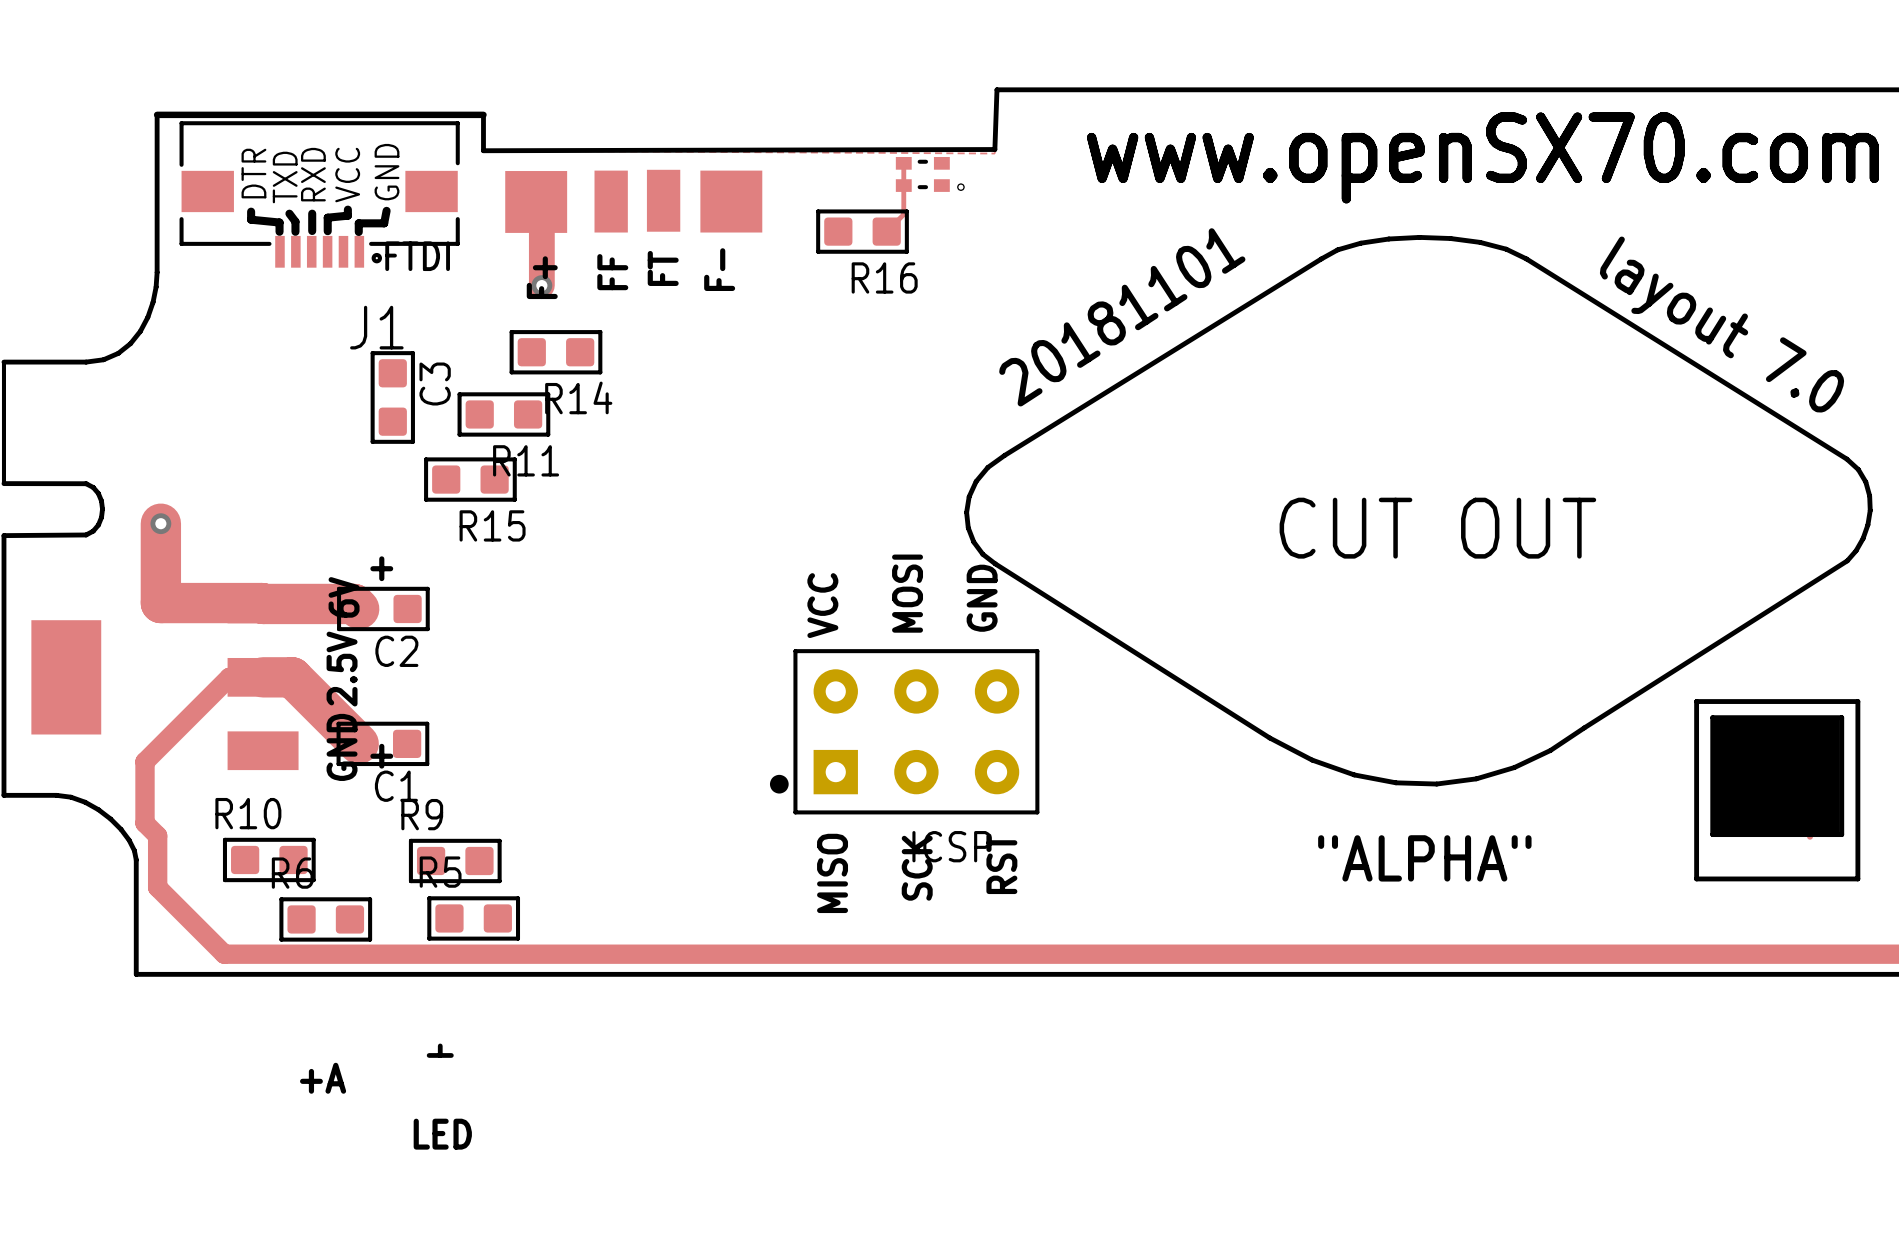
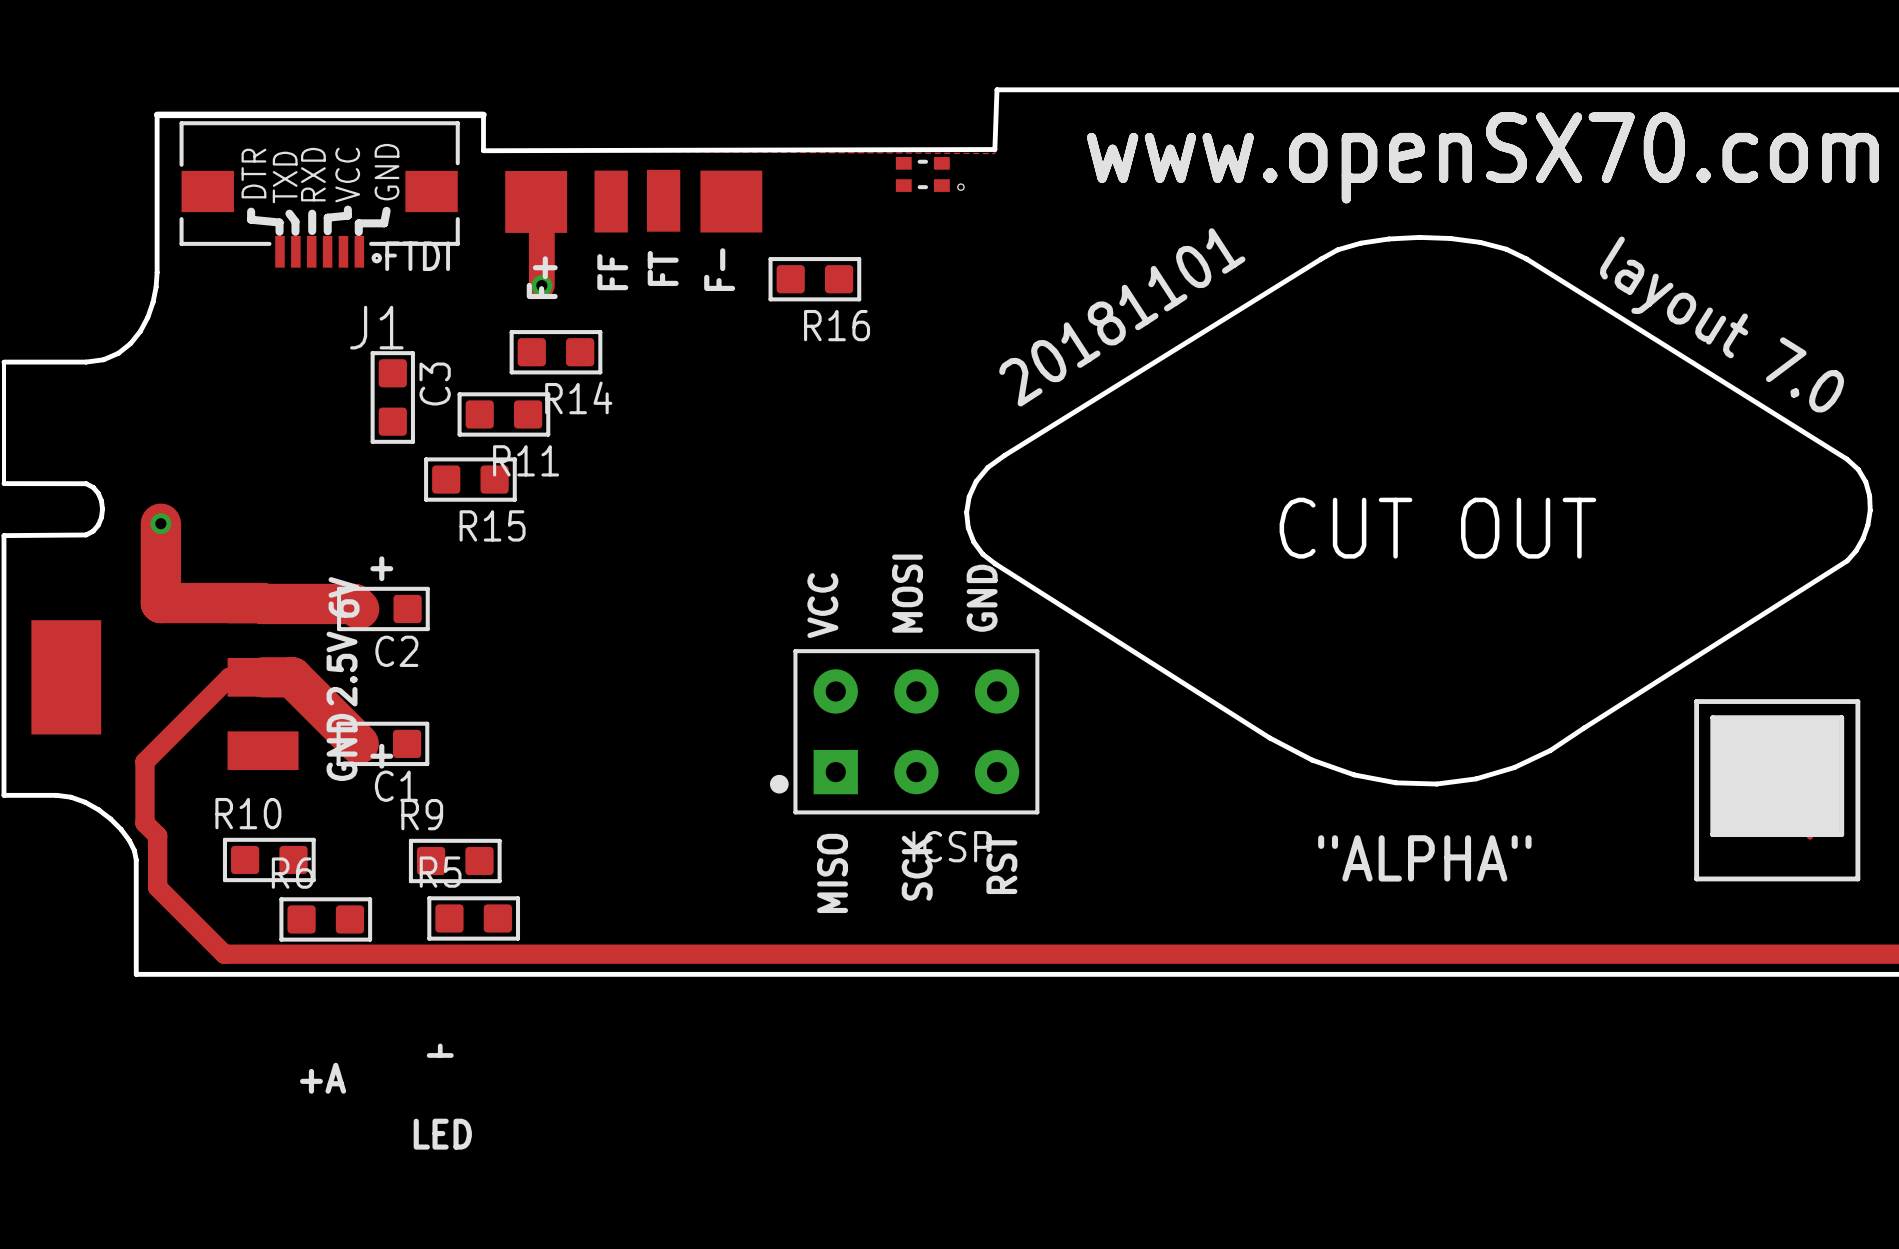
track: (903, 163) (903, 214) (886, 231) -> none
R16 position: (862, 231) -> (814, 279)

